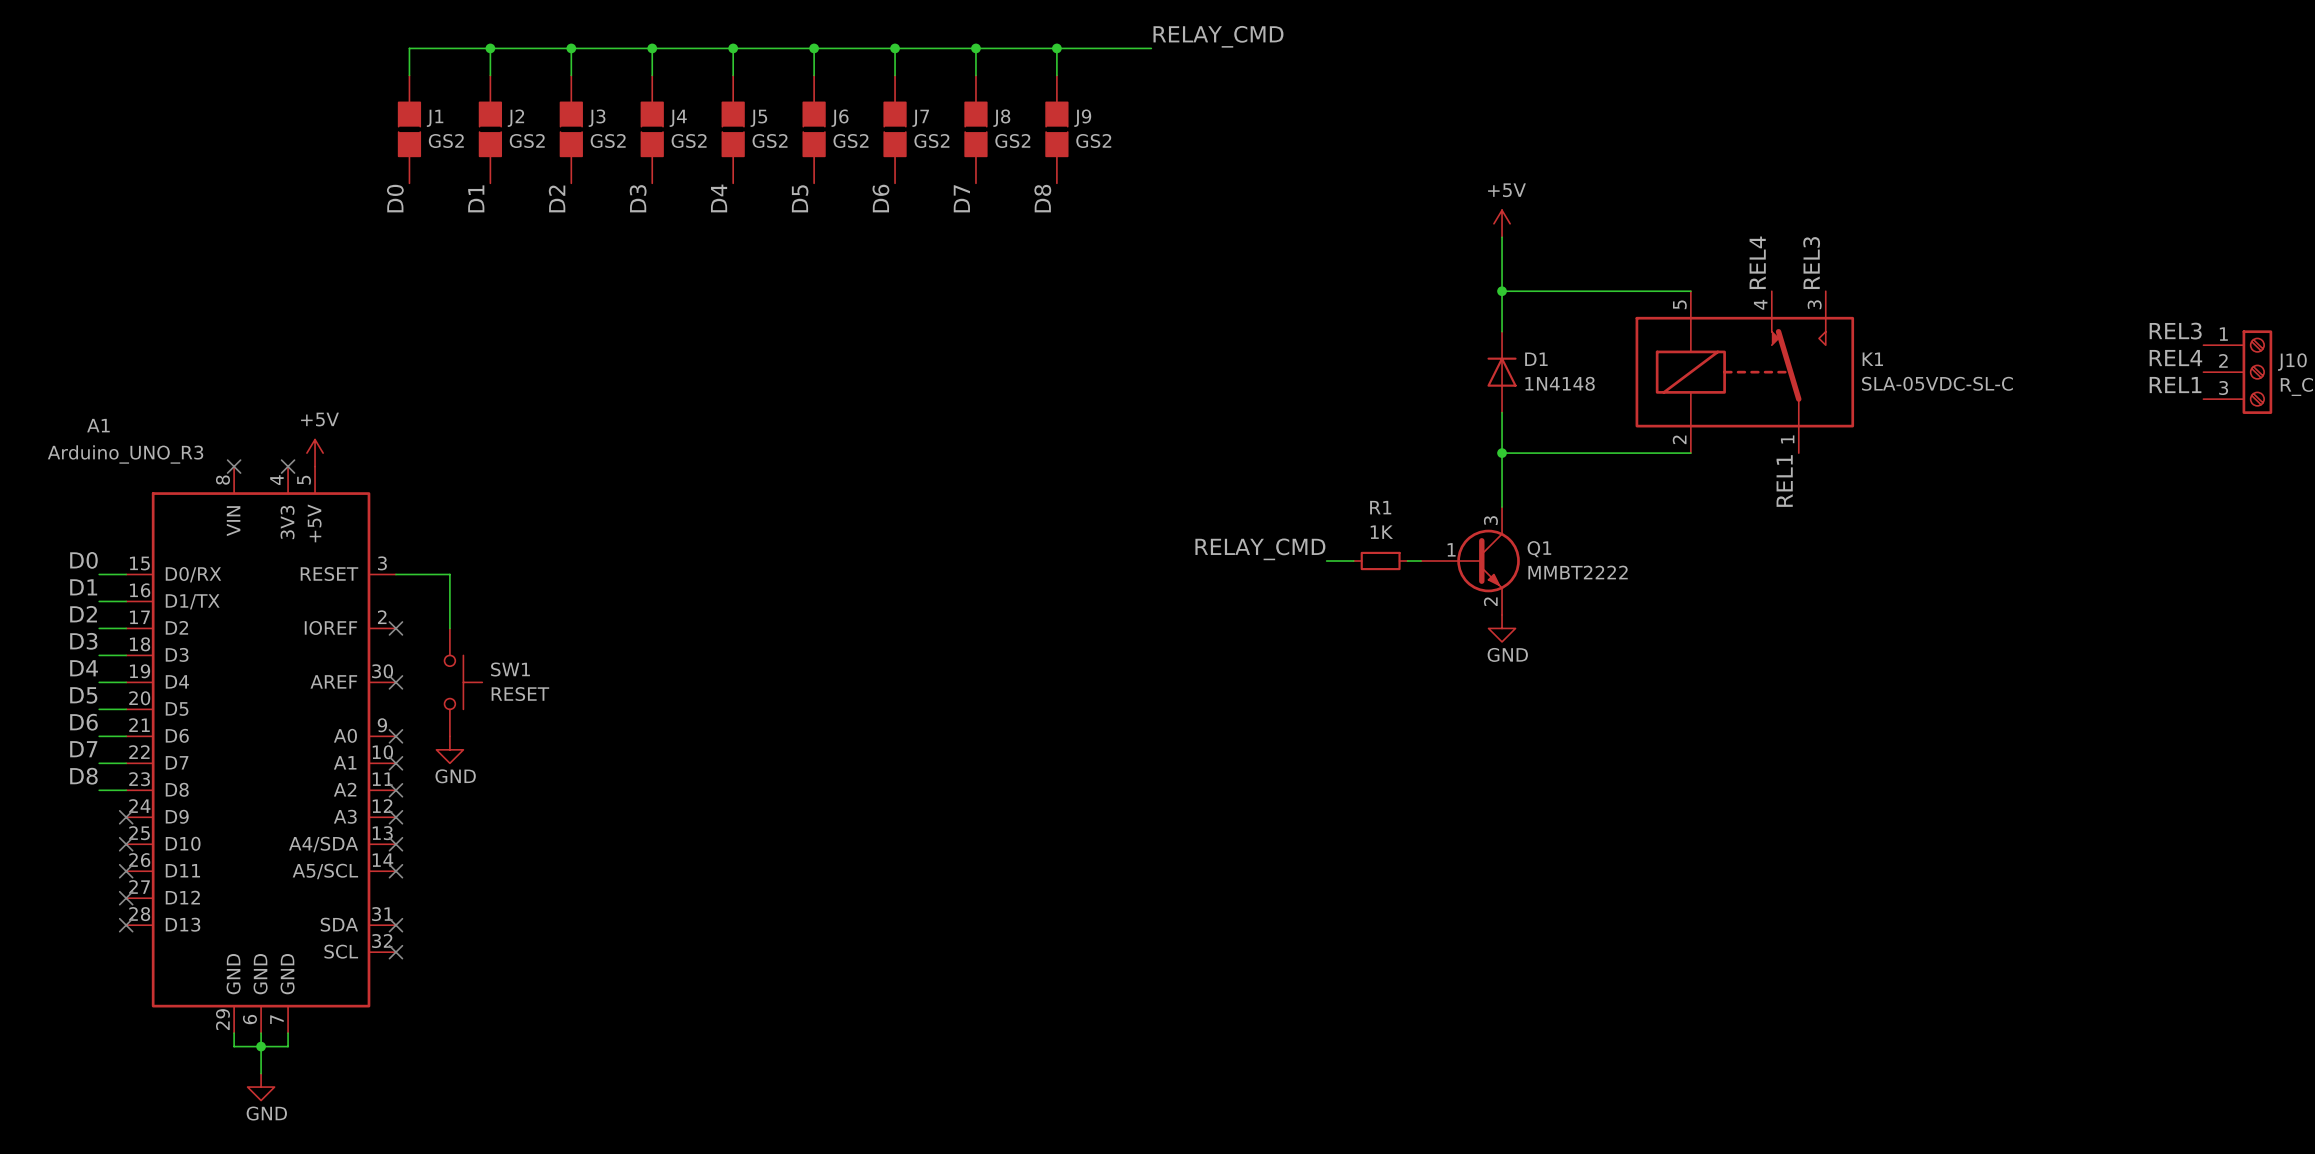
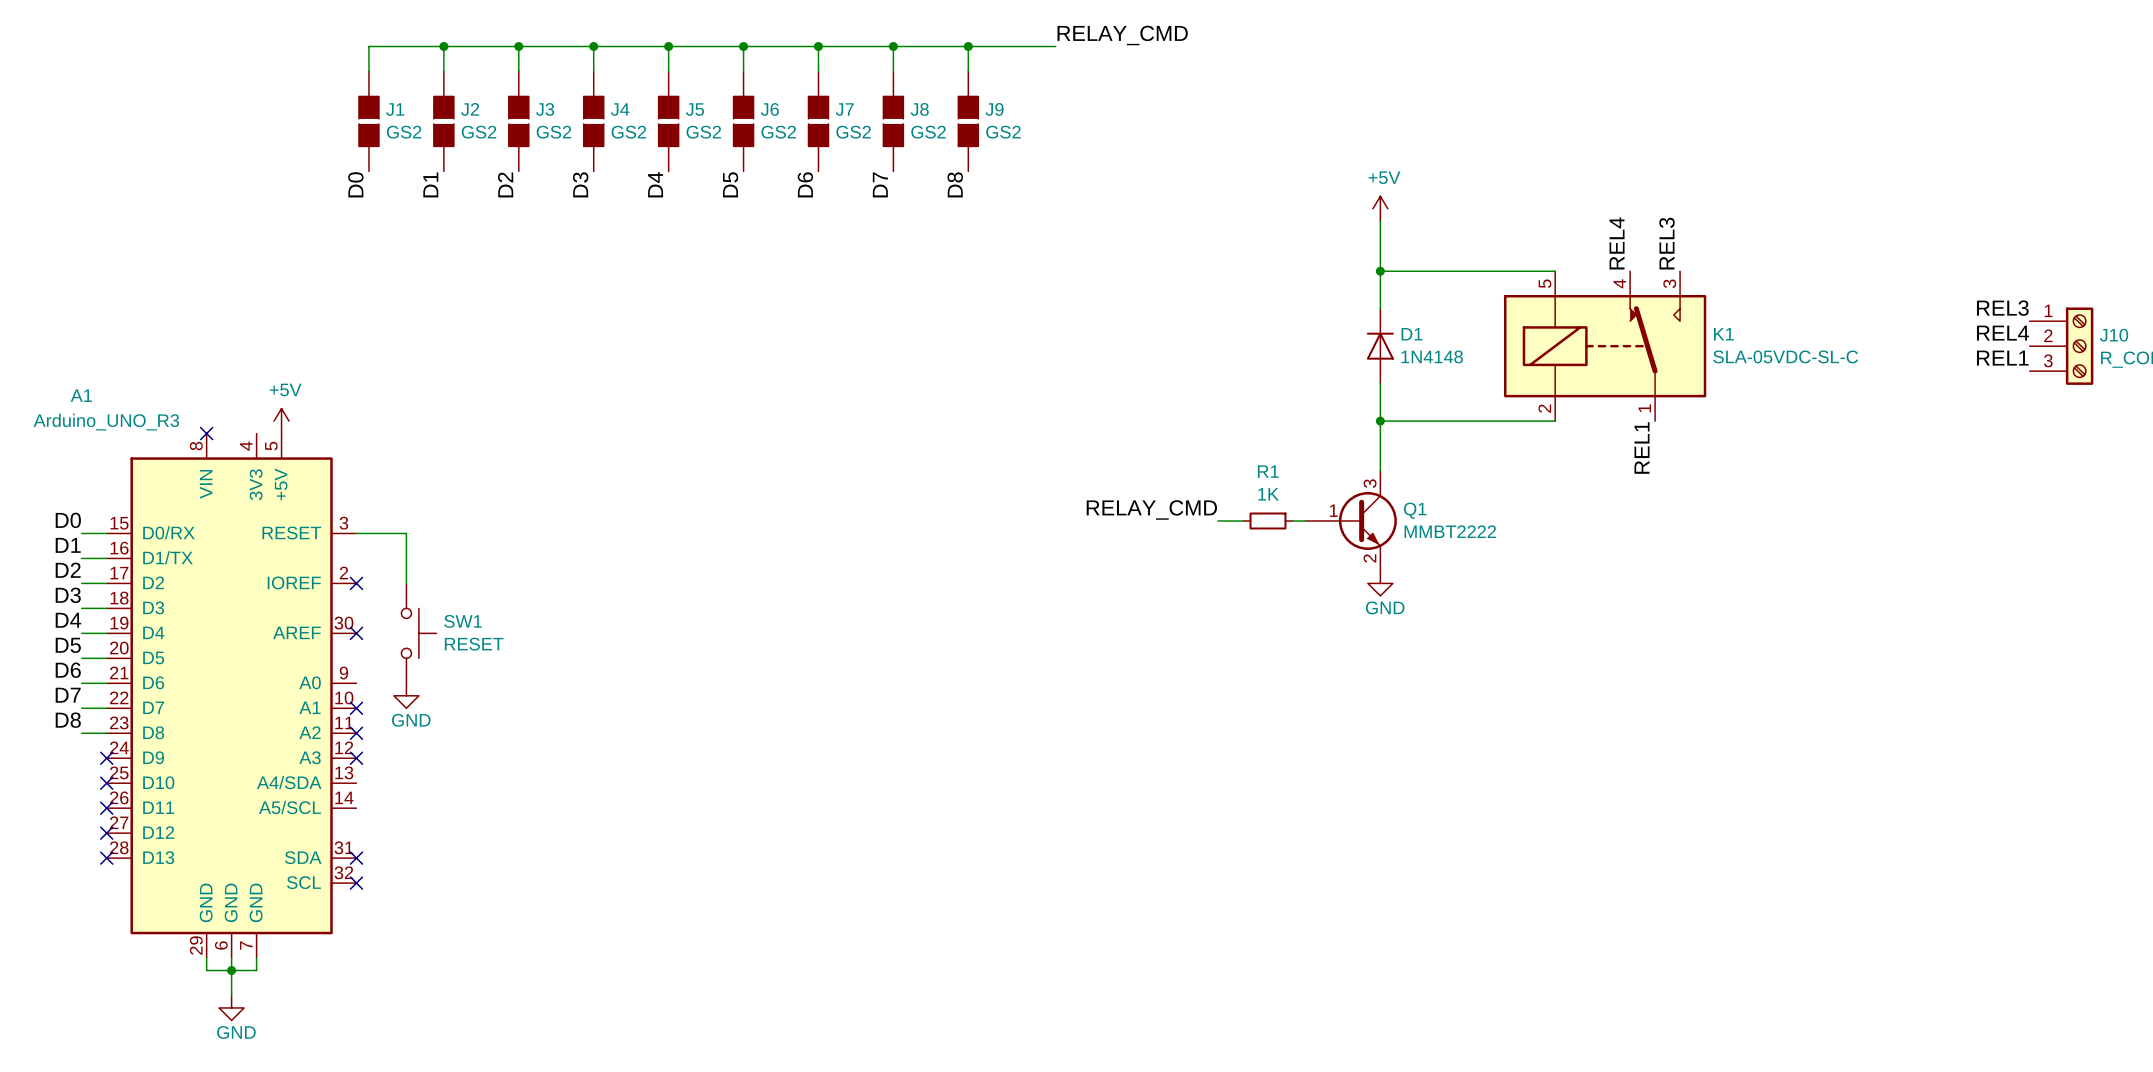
no-connect mark: (288, 466) -> none
no-connect mark: (395, 736) -> none
no-connect mark: (395, 844) -> none
no-connect mark: (395, 871) -> none

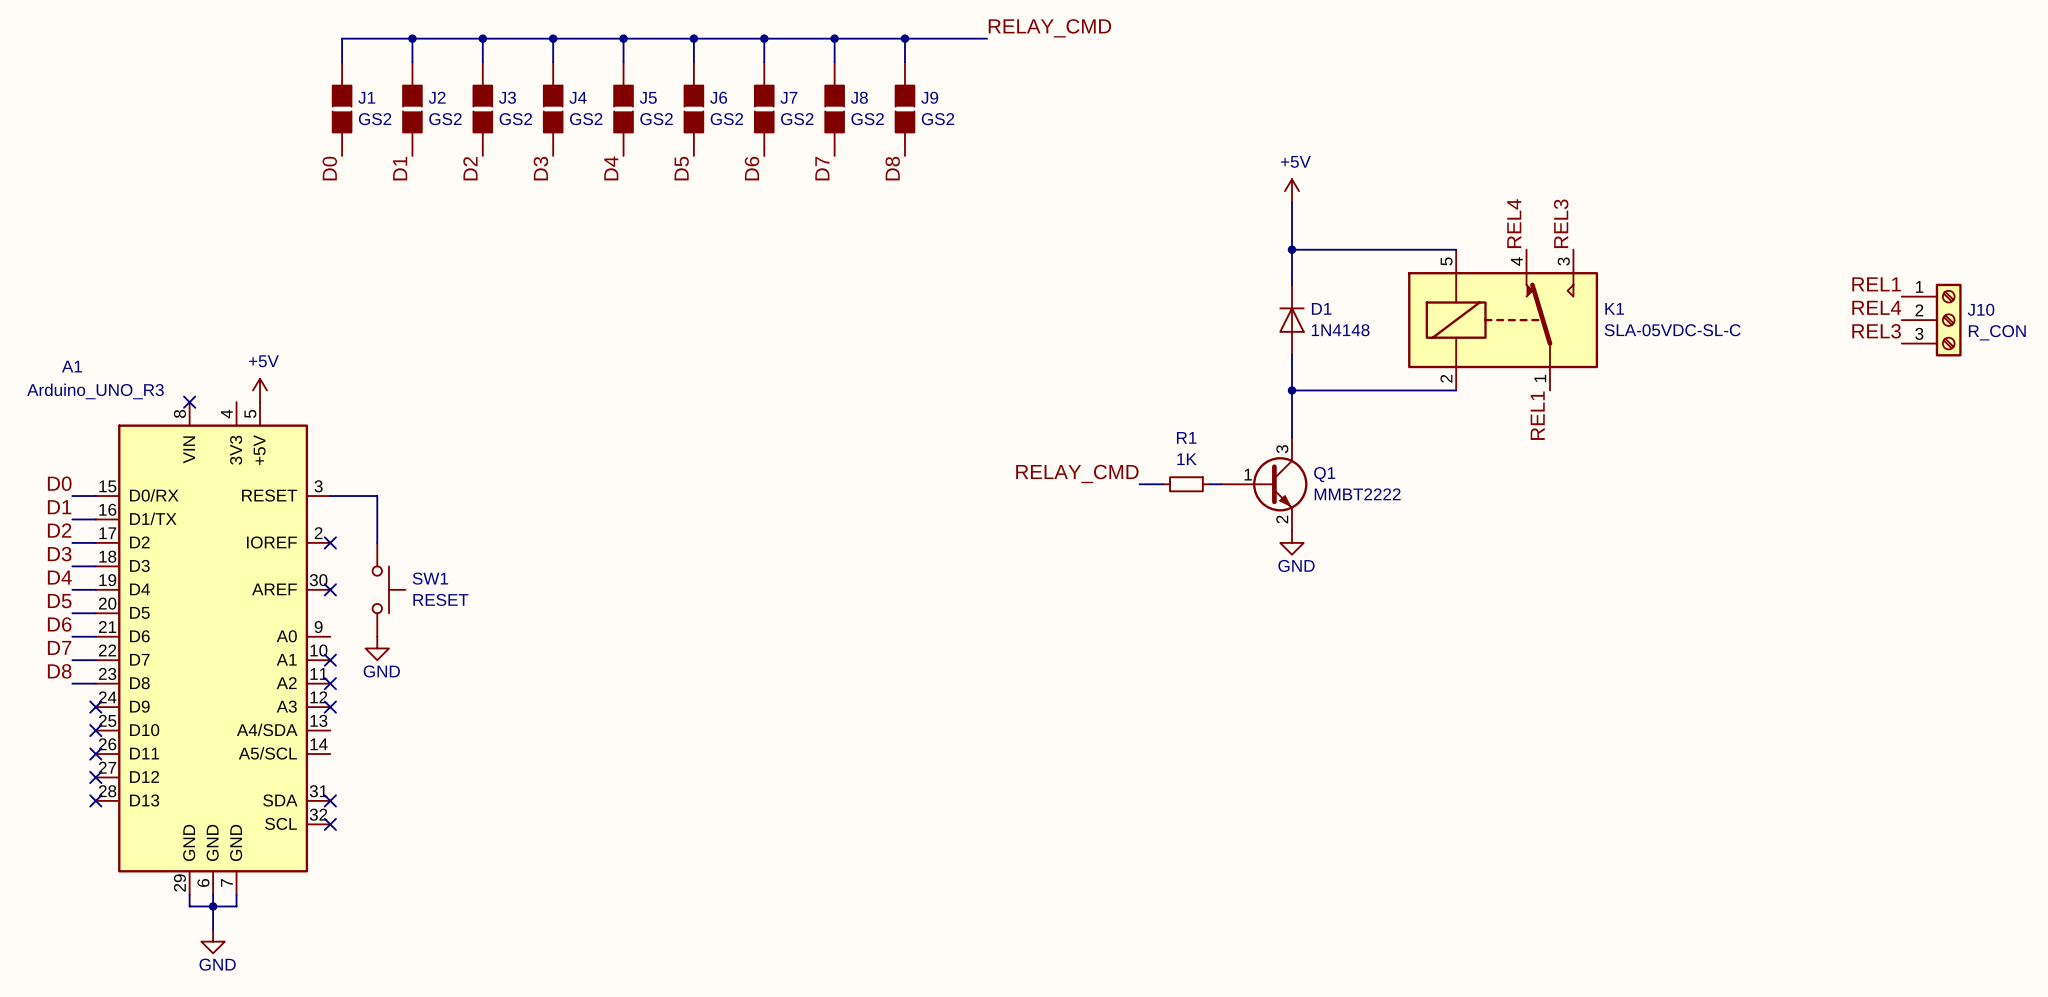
label: REL3 (2002, 308) -> REL1 (1876, 284)
label: REL1 (2002, 358) -> REL3 (1876, 331)

